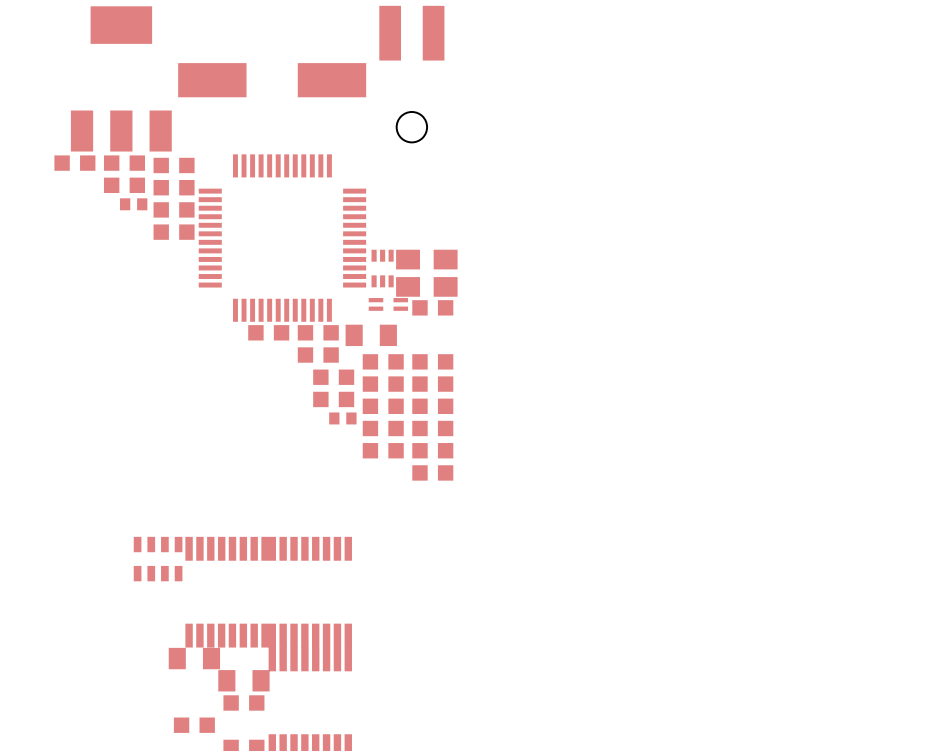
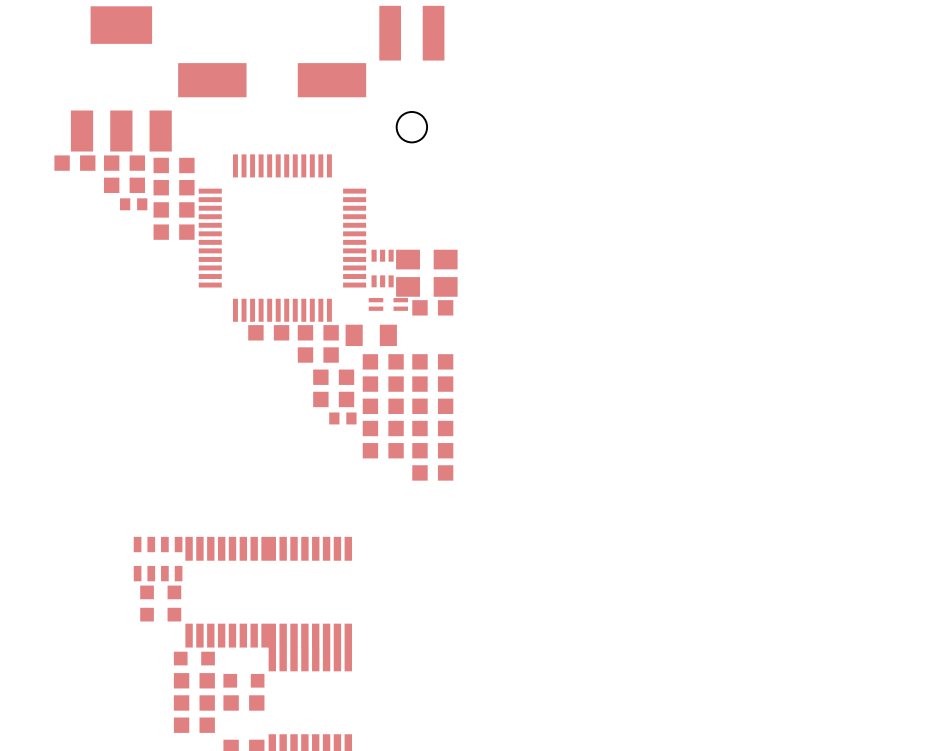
part: none -> (160, 592)
part: none -> (160, 614)
part footprint: [168, 647, 221, 670] -> [173, 651, 215, 666]
part footprint: [218, 670, 270, 692] -> [223, 673, 265, 688]
part: none -> (194, 680)
part: none -> (194, 702)

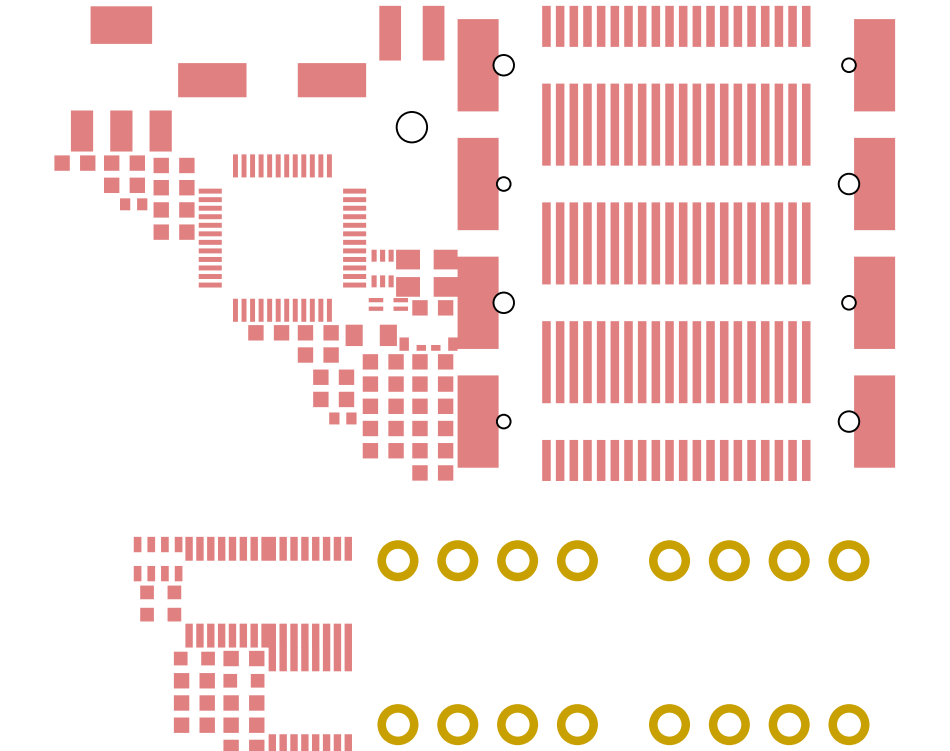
part: none -> (676, 65)
part: none -> (676, 184)
part: none -> (676, 302)
part: none -> (428, 344)
part: none -> (676, 421)
part: none -> (487, 560)
part: none -> (759, 560)
part: none -> (243, 658)
part: none -> (487, 724)
part: none -> (759, 724)
part: none -> (243, 725)

